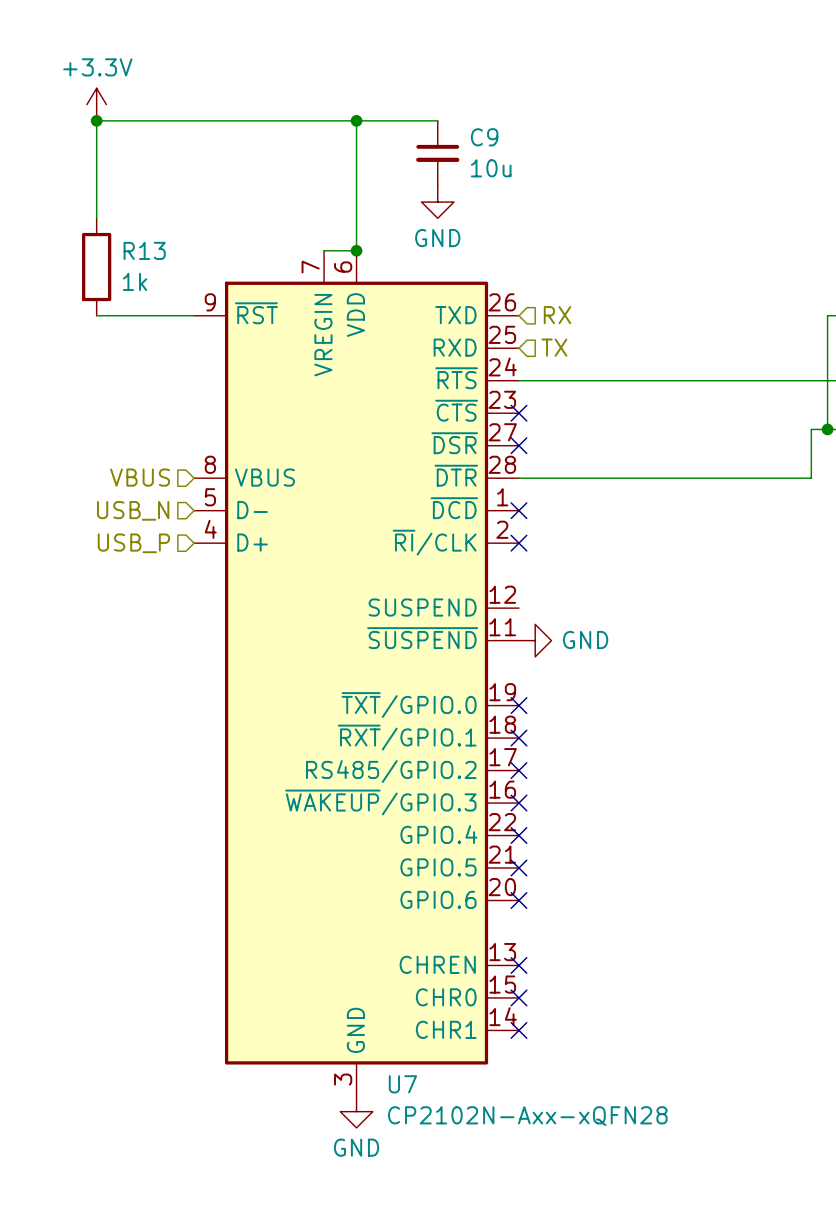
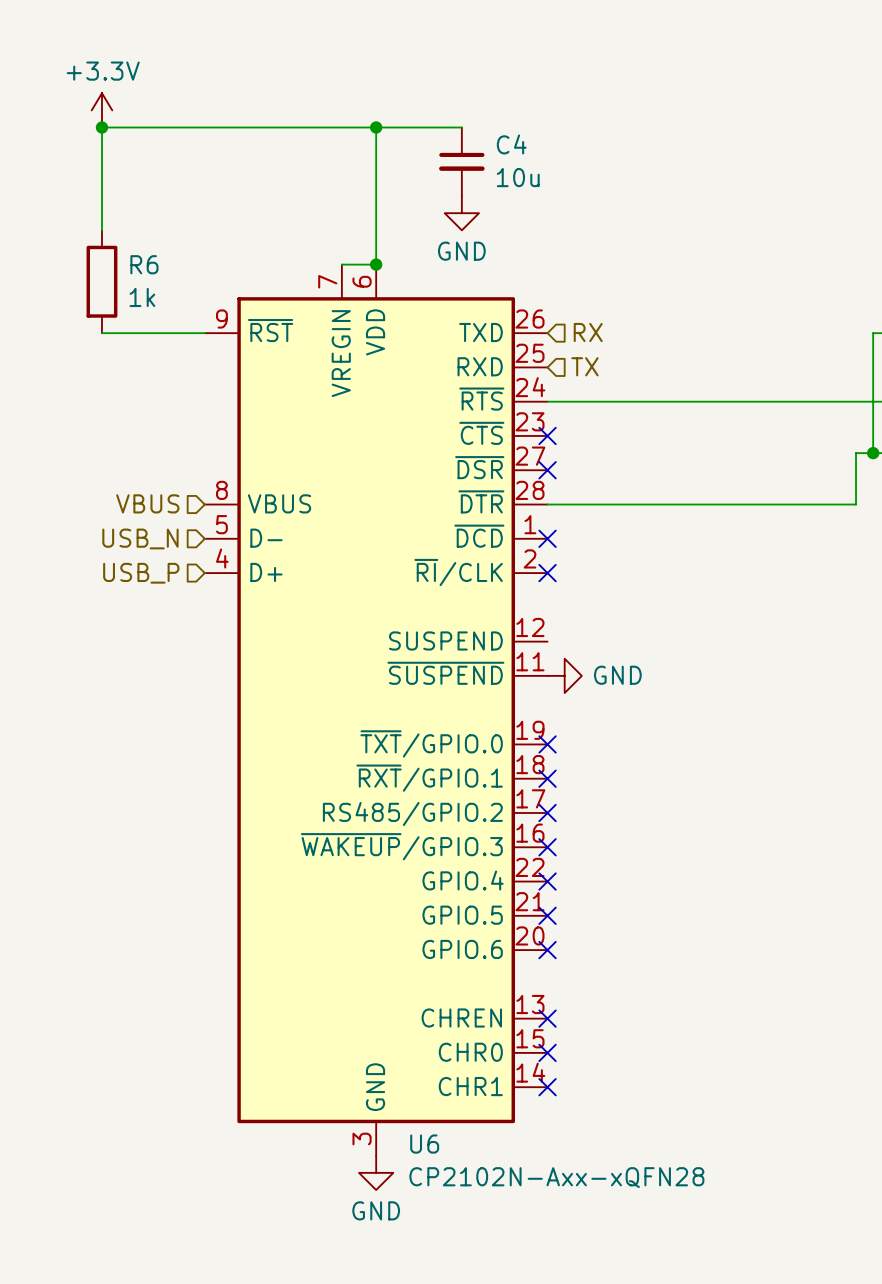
C9 name: C9 (484, 137) -> C4 (511, 144)
R13 name: R13 (144, 250) -> R6 (144, 264)
U7 name: U7 (402, 1084) -> U6 (424, 1144)

